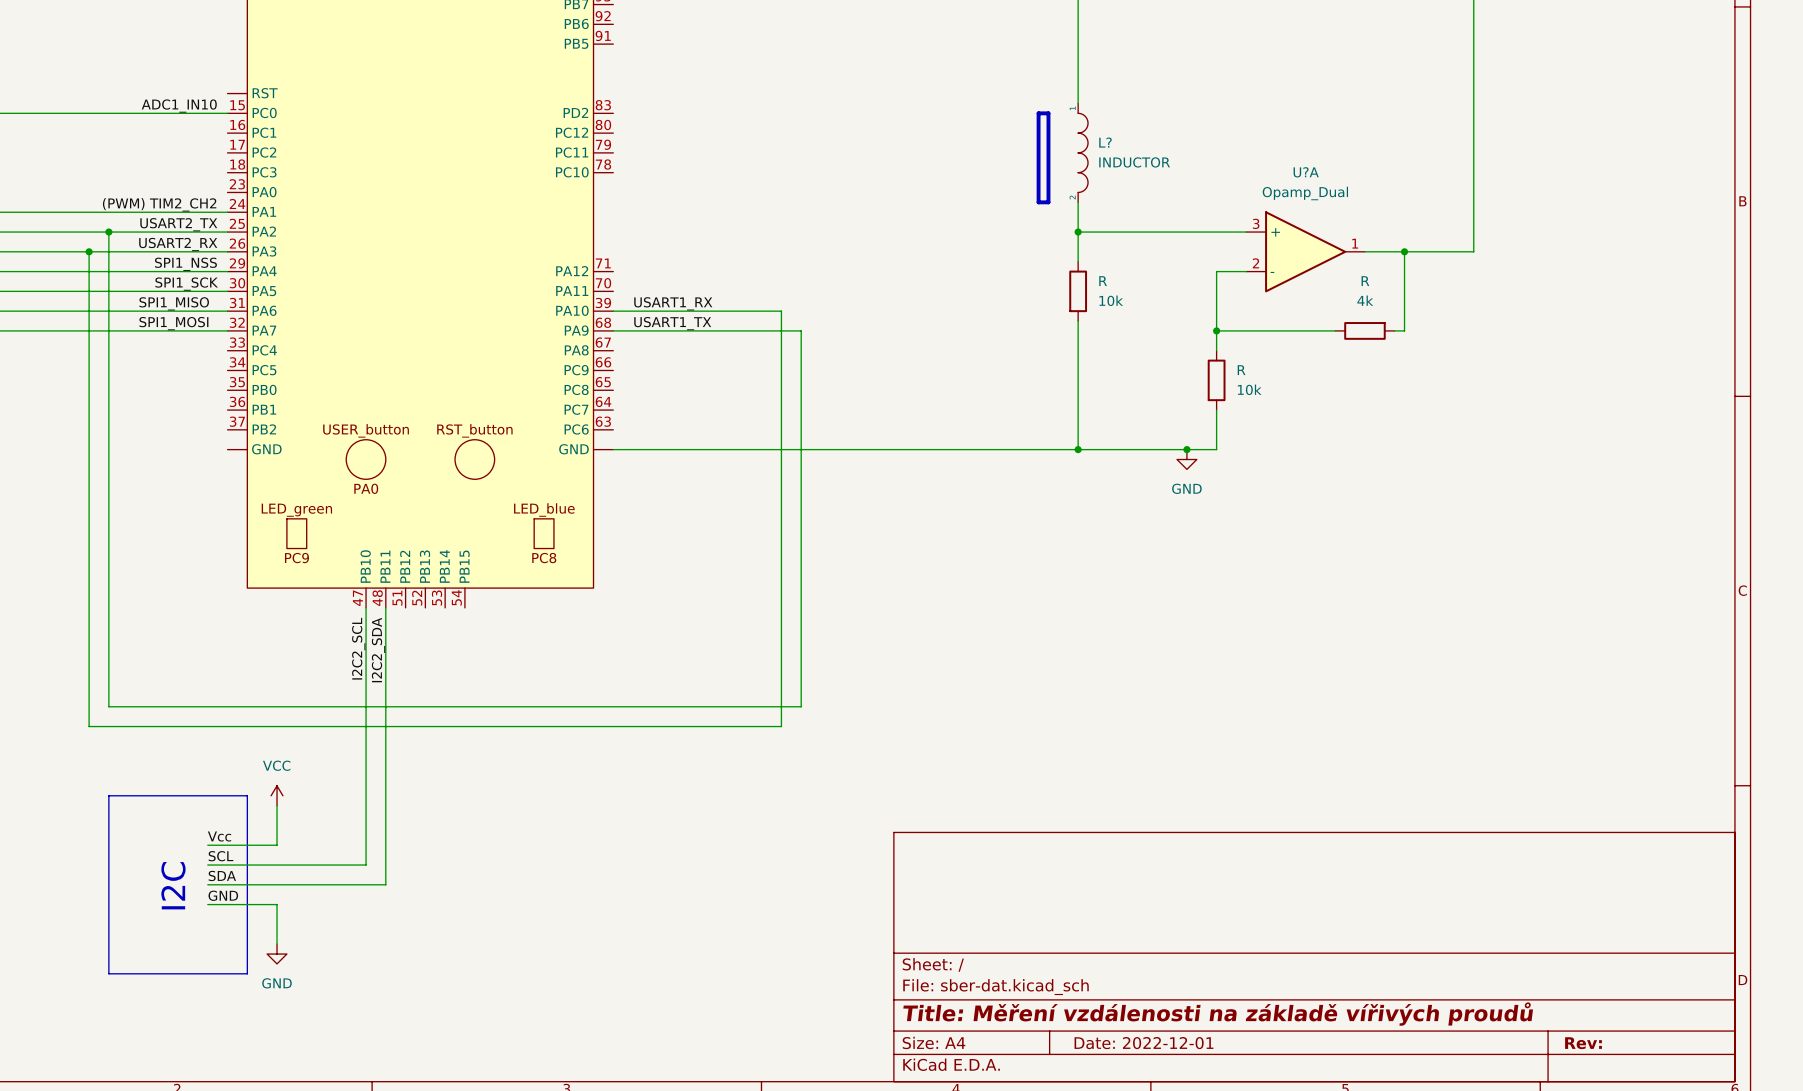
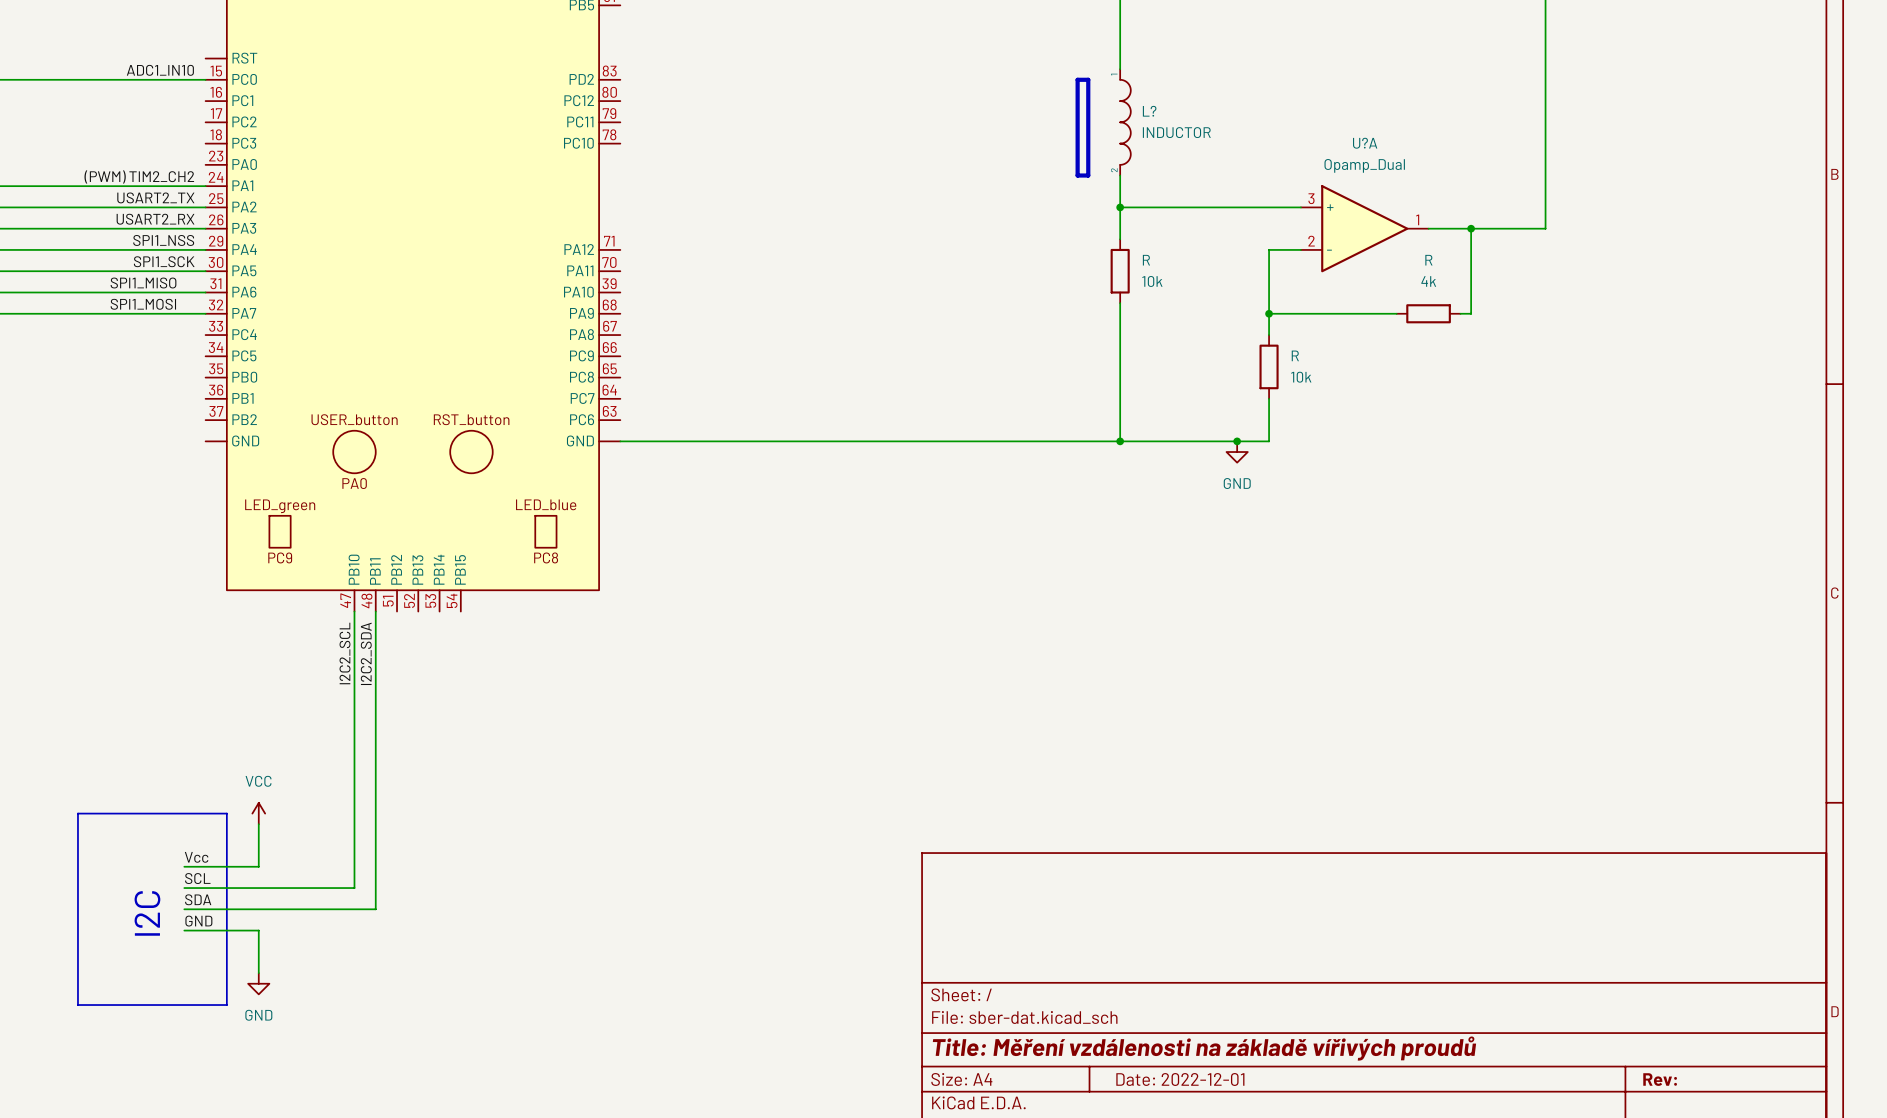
wire: (108, 232) (108, 706) (801, 706) (801, 330) (613, 330) -> none
junction: (108, 232) -> none
wire: (89, 251) (89, 726) (781, 726) (781, 311) (613, 311) -> none
junction: (89, 251) -> none
label: USART1_RX (673, 303) -> none
label: USART1_TX (672, 323) -> none

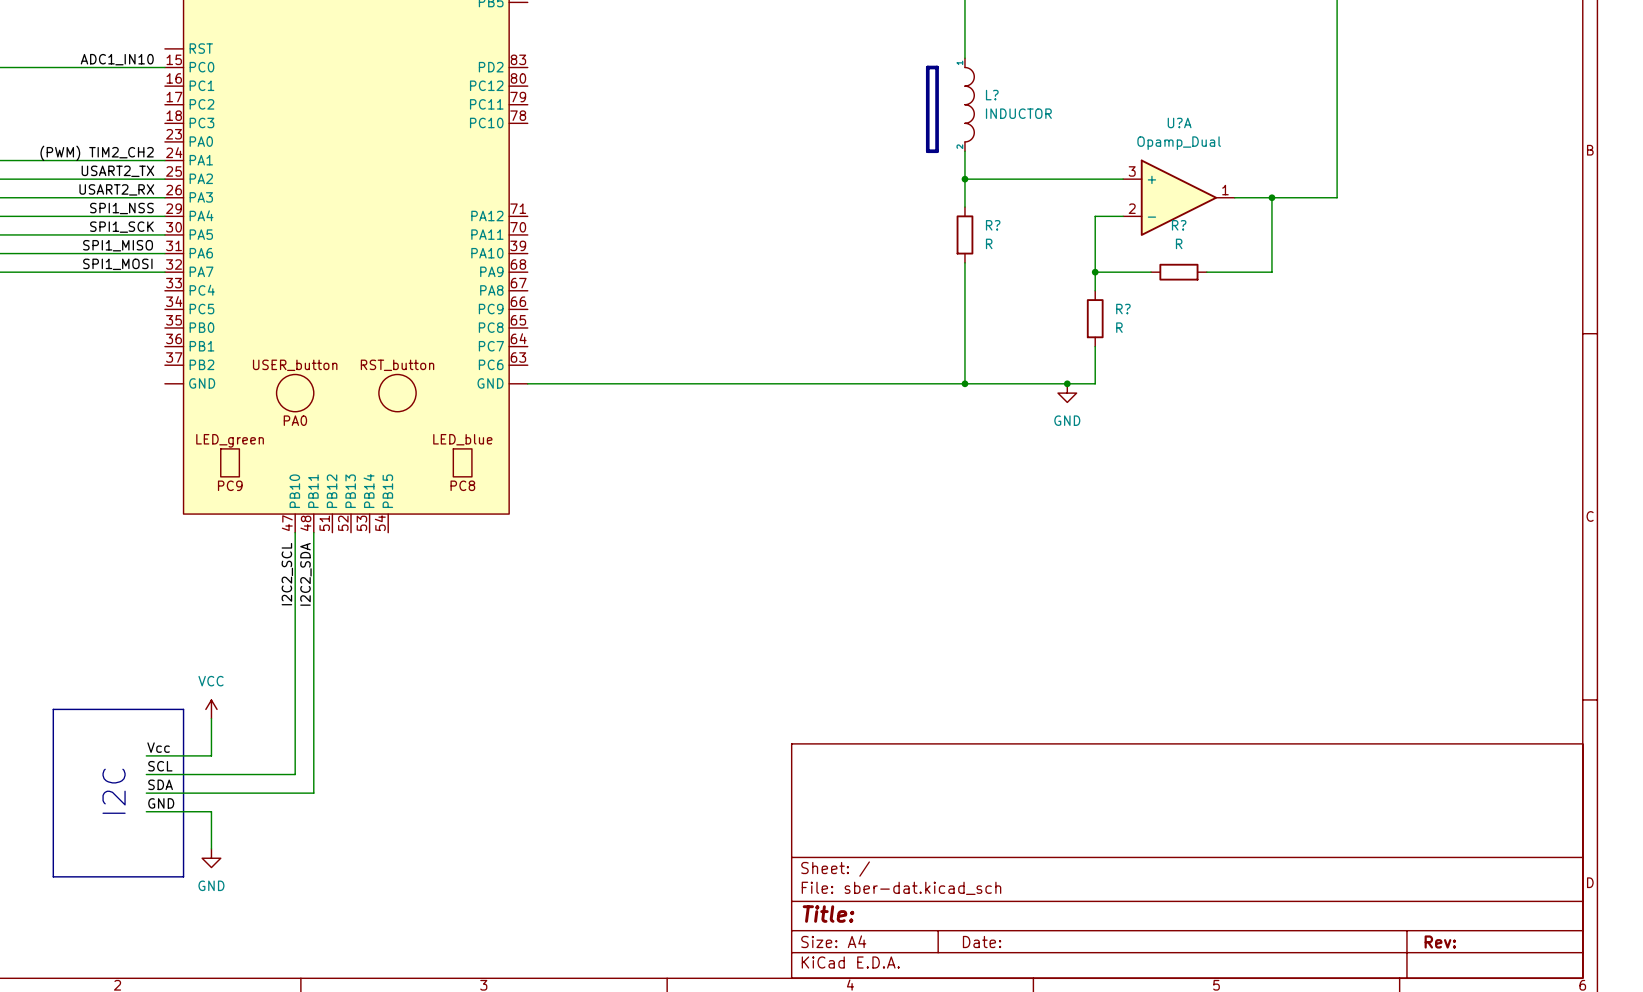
R name: R (1146, 260) -> R? (993, 225)
R value: 10k (1152, 281) -> R (989, 243)
wire: (1332, 313) (1396, 313) -> (1262, 272) (1206, 272)
R?: none -> R (1178, 272)
R: 4k (1428, 313) -> none
R name: R (1295, 355) -> R? (1123, 309)
R value: 10k (1301, 377) -> R (1119, 327)
title block: Title: Měření vzdálenosti na základě vířivých proudů (1204, 1048) -> Title: (828, 914)
title block: Date: 2022-12-01 (1180, 1079) -> Date: (982, 942)

